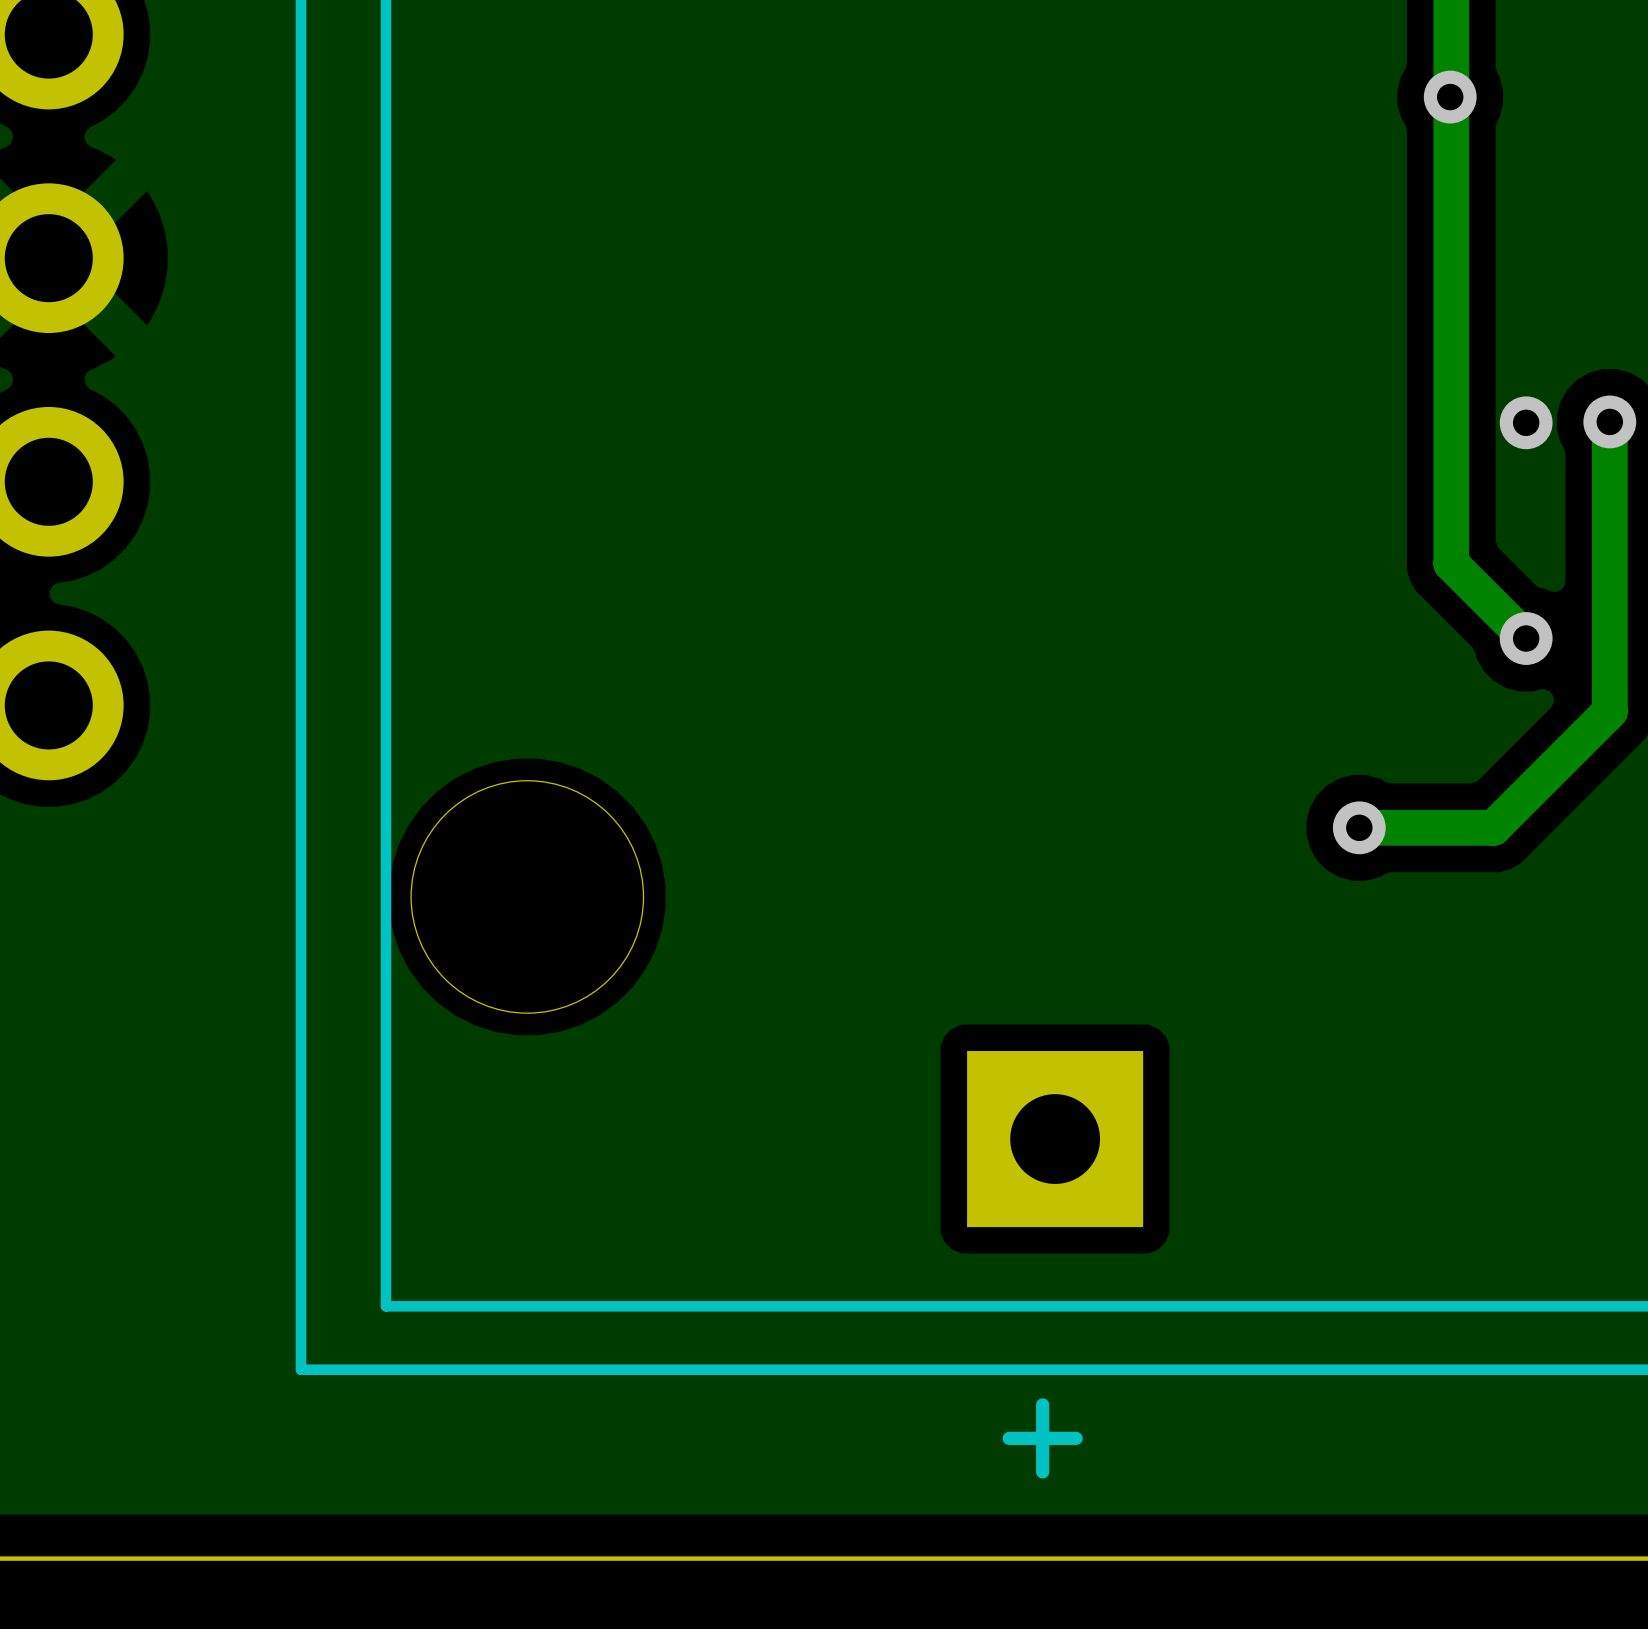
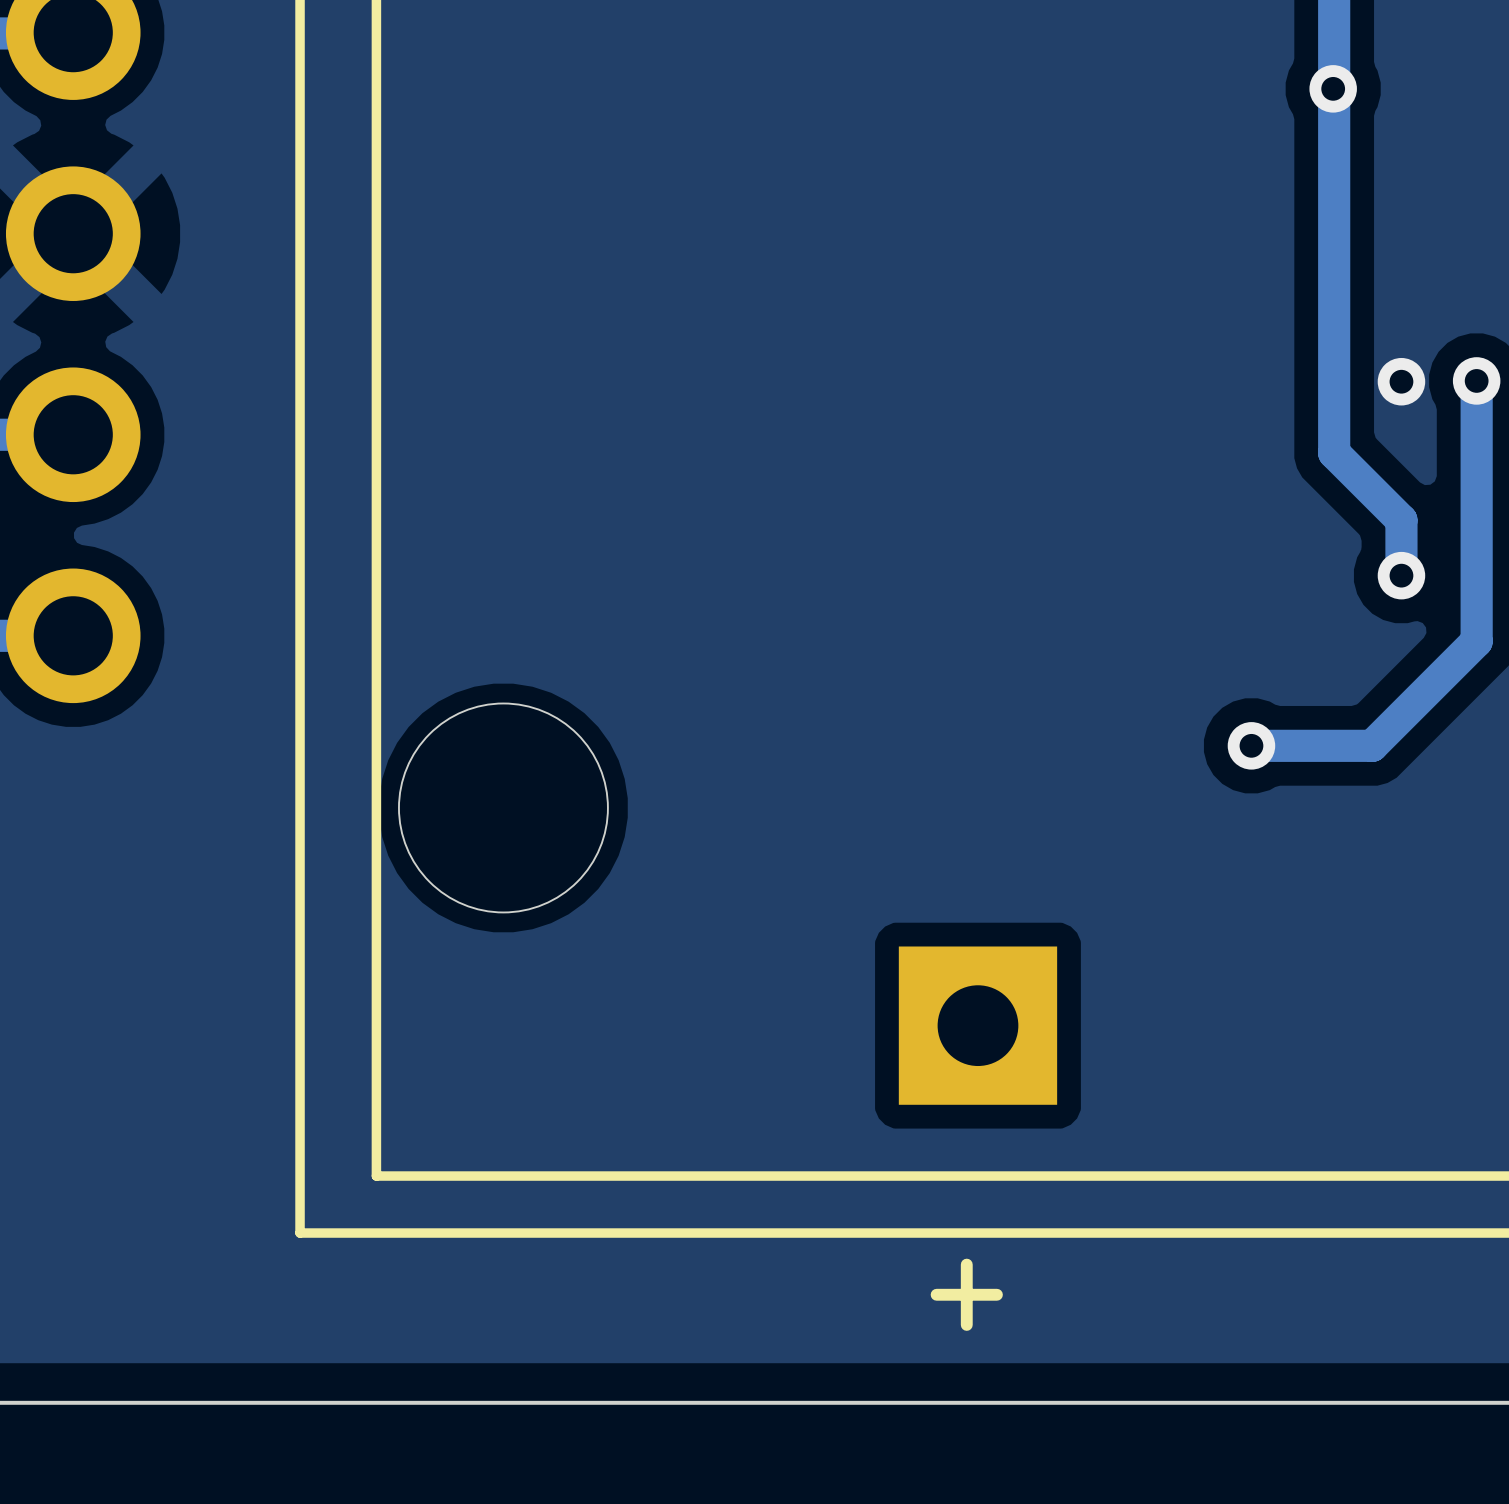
track: (1451, 502) (1451, 563) (1526, 638) -> (1334, 452) (1401, 520) (1401, 575)

